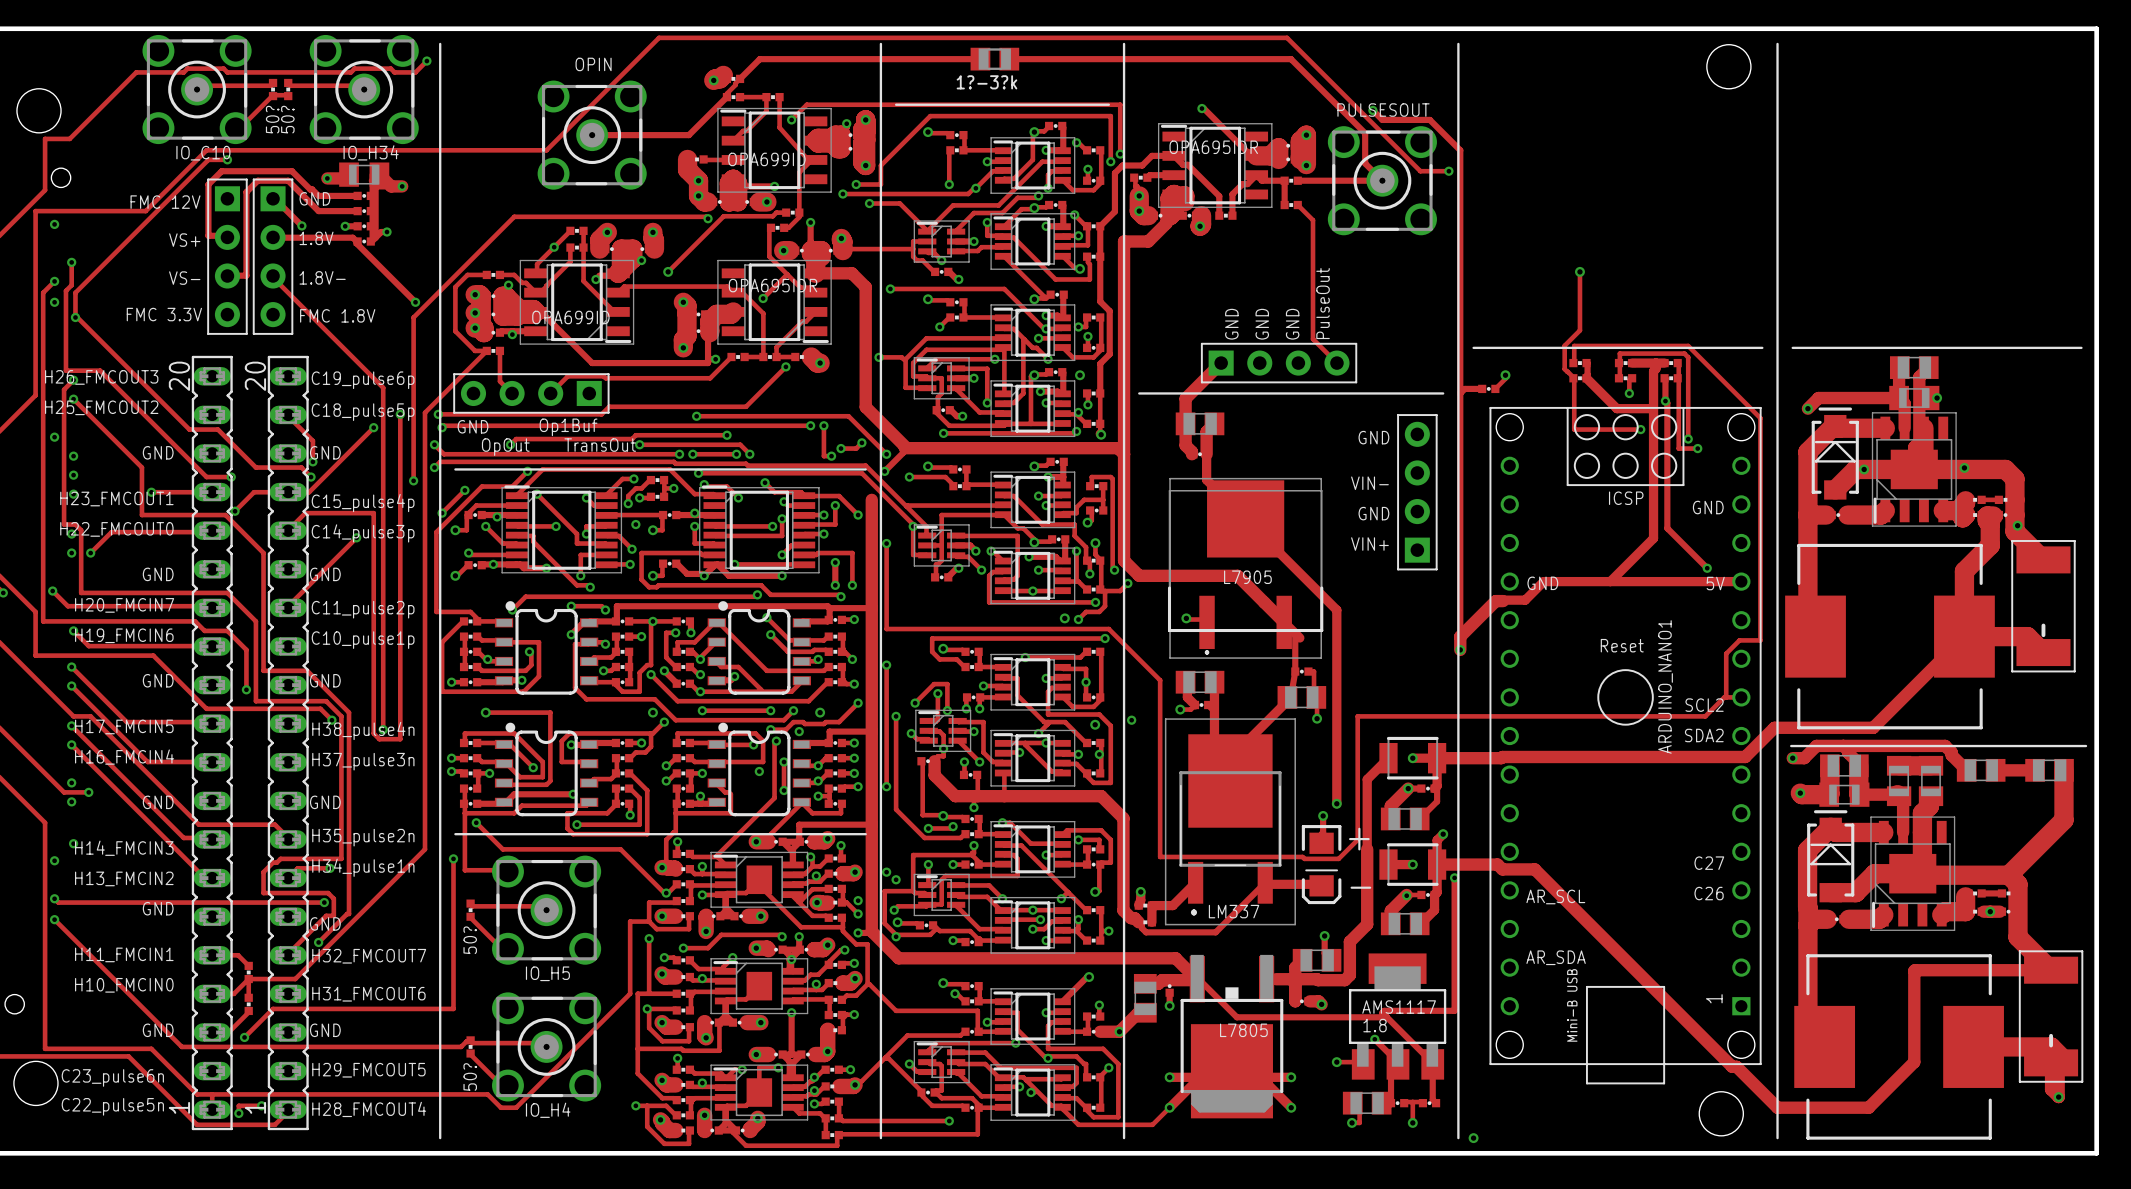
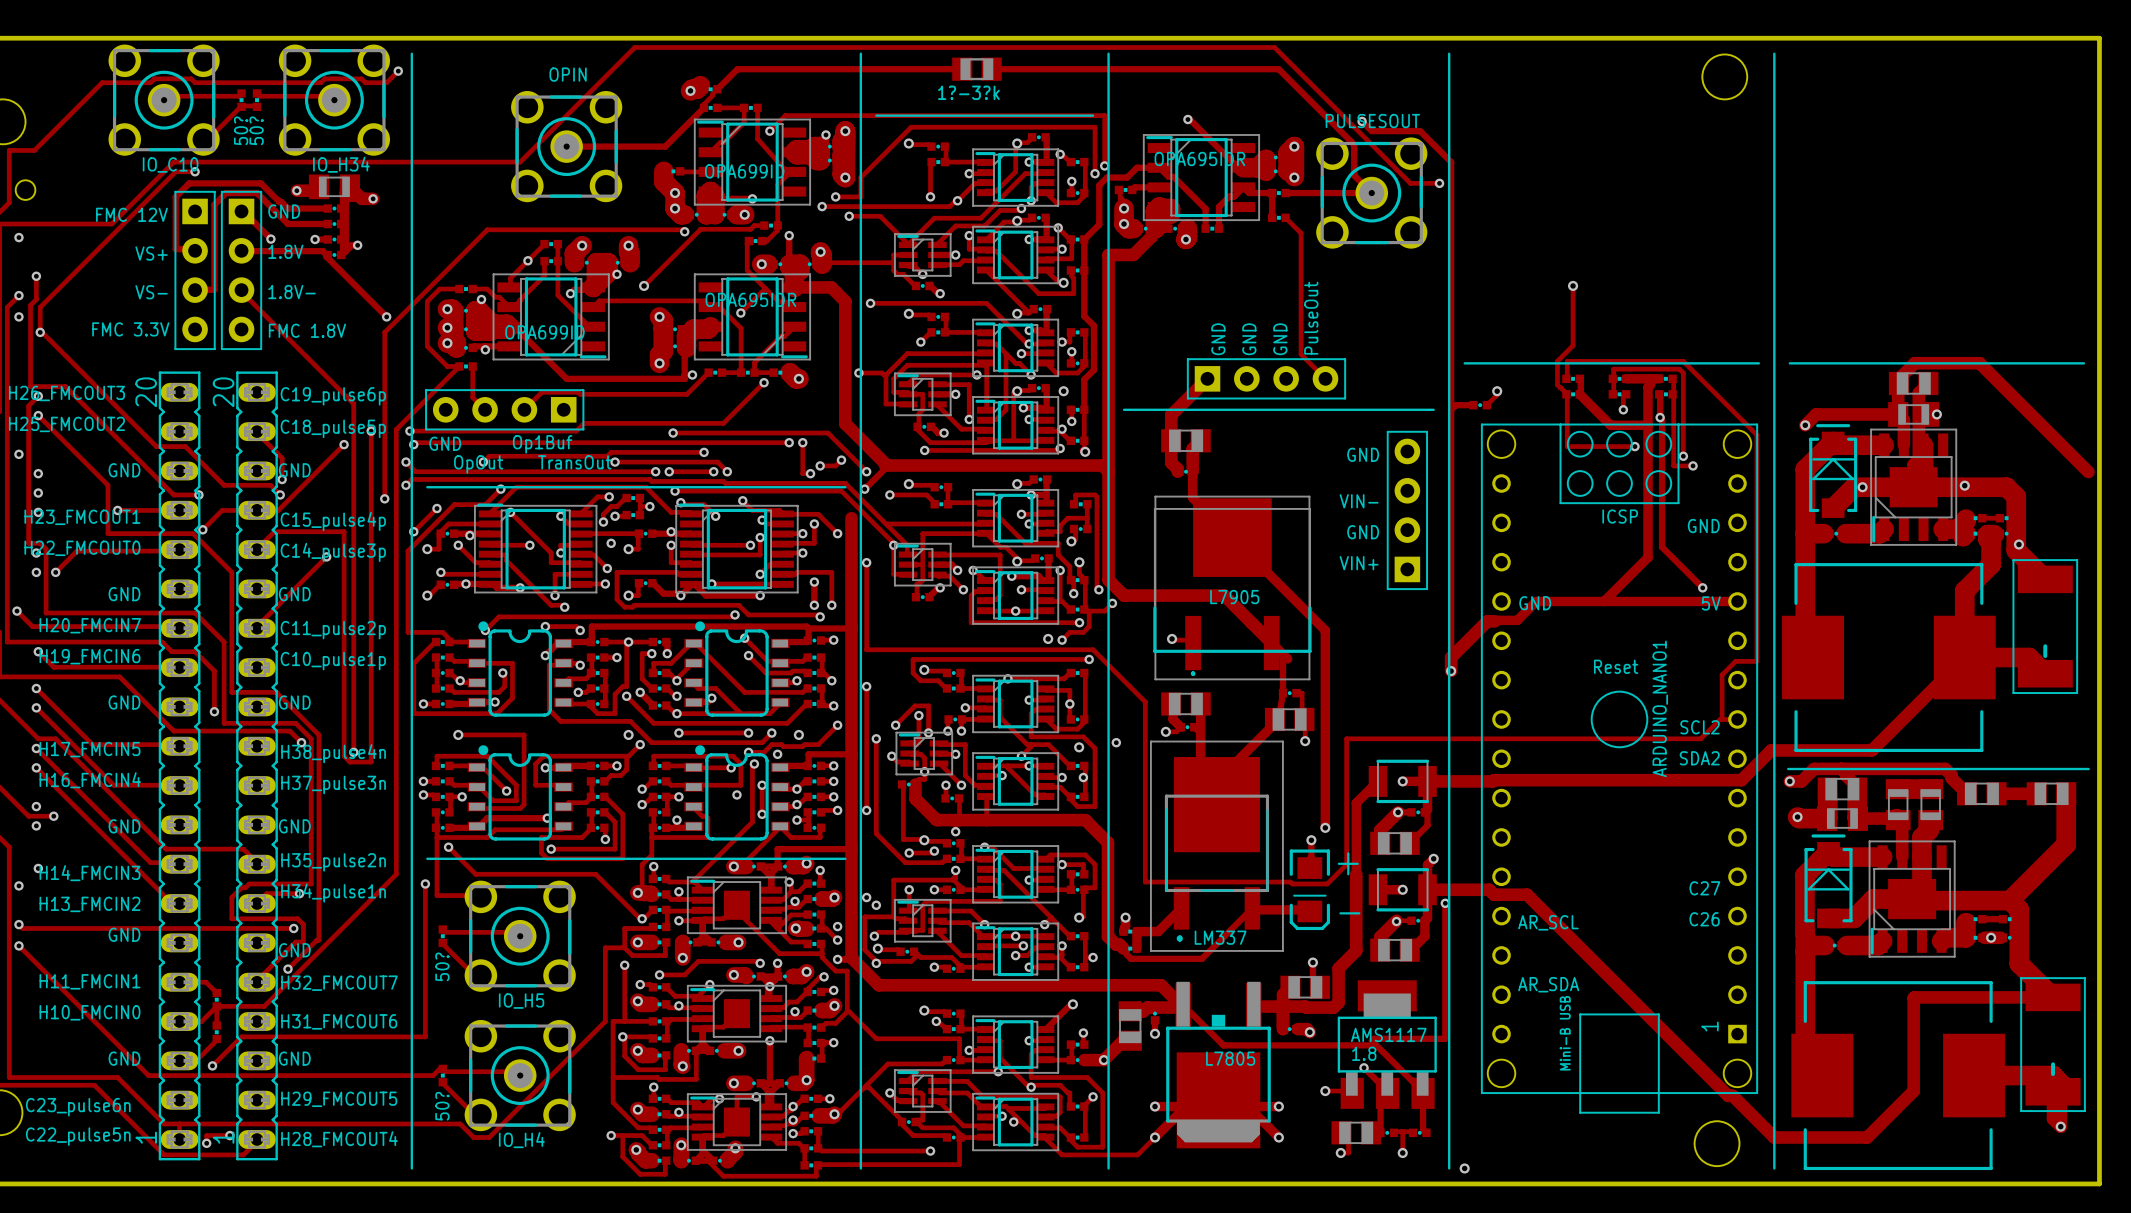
track: none -> (1898, 383) (1898, 378) (1914, 363) (1979, 363) (2088, 472)

